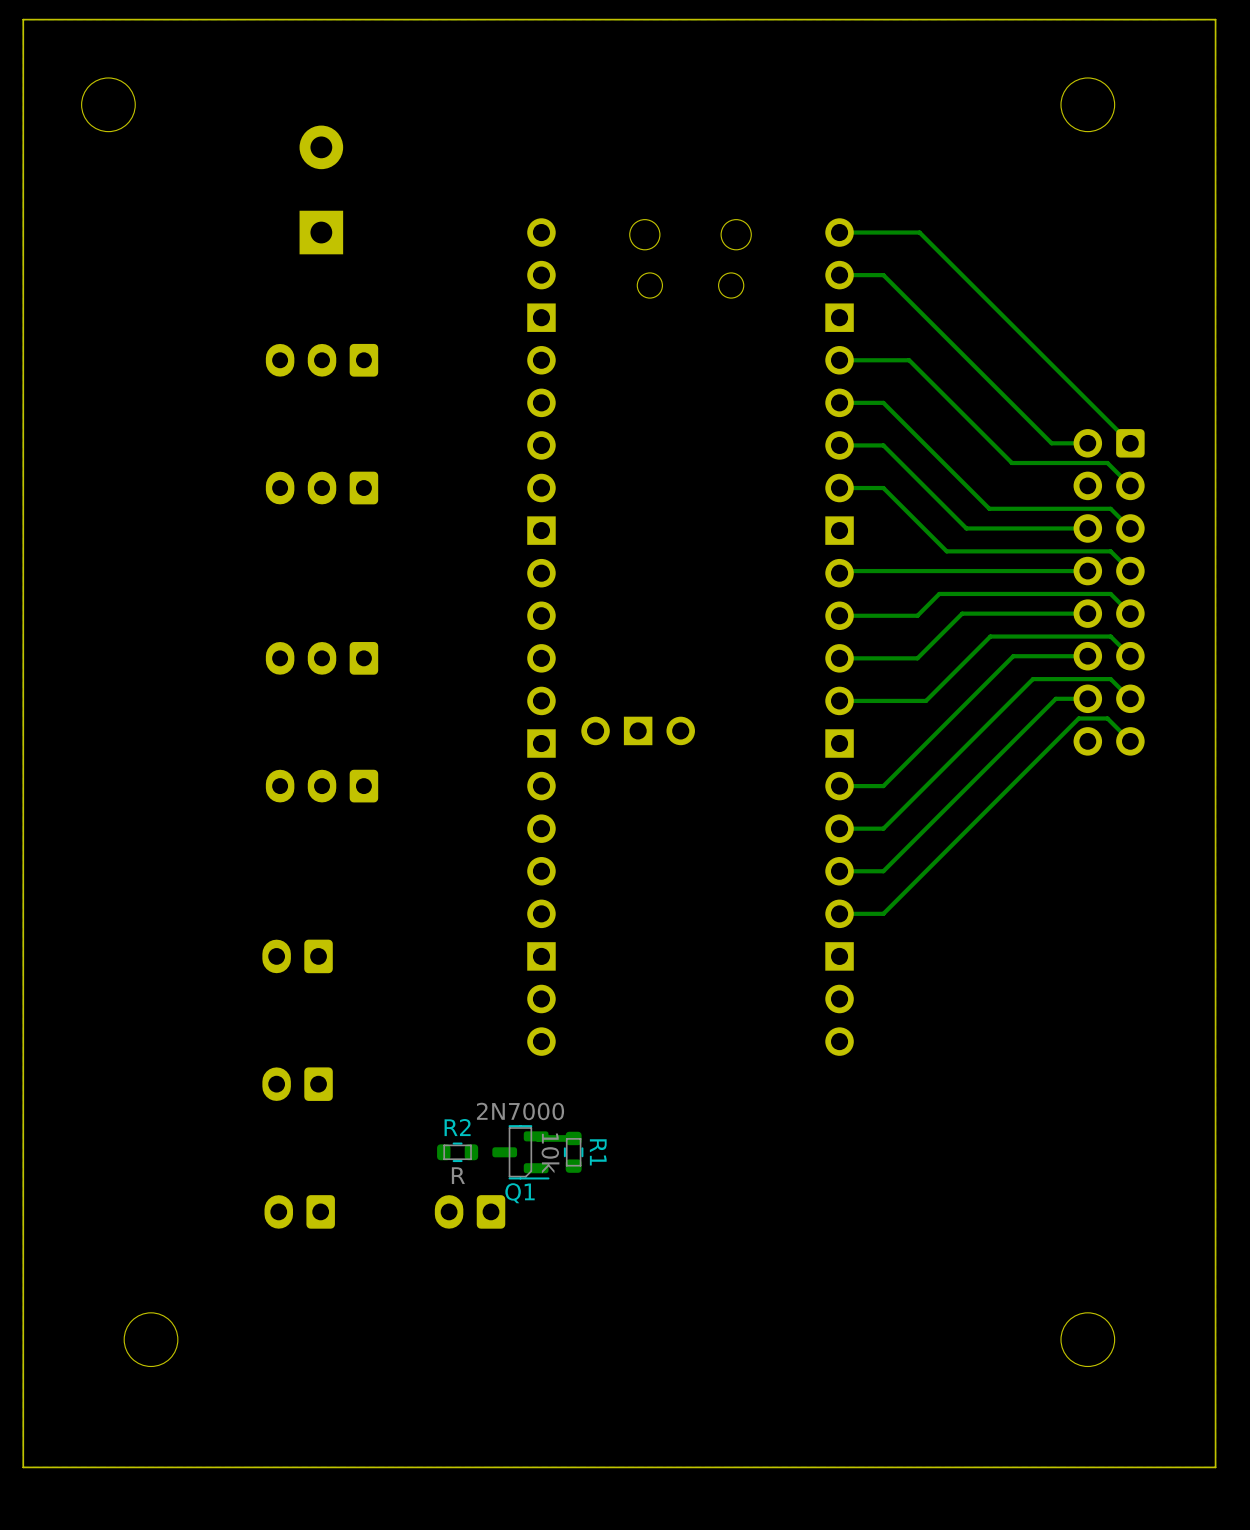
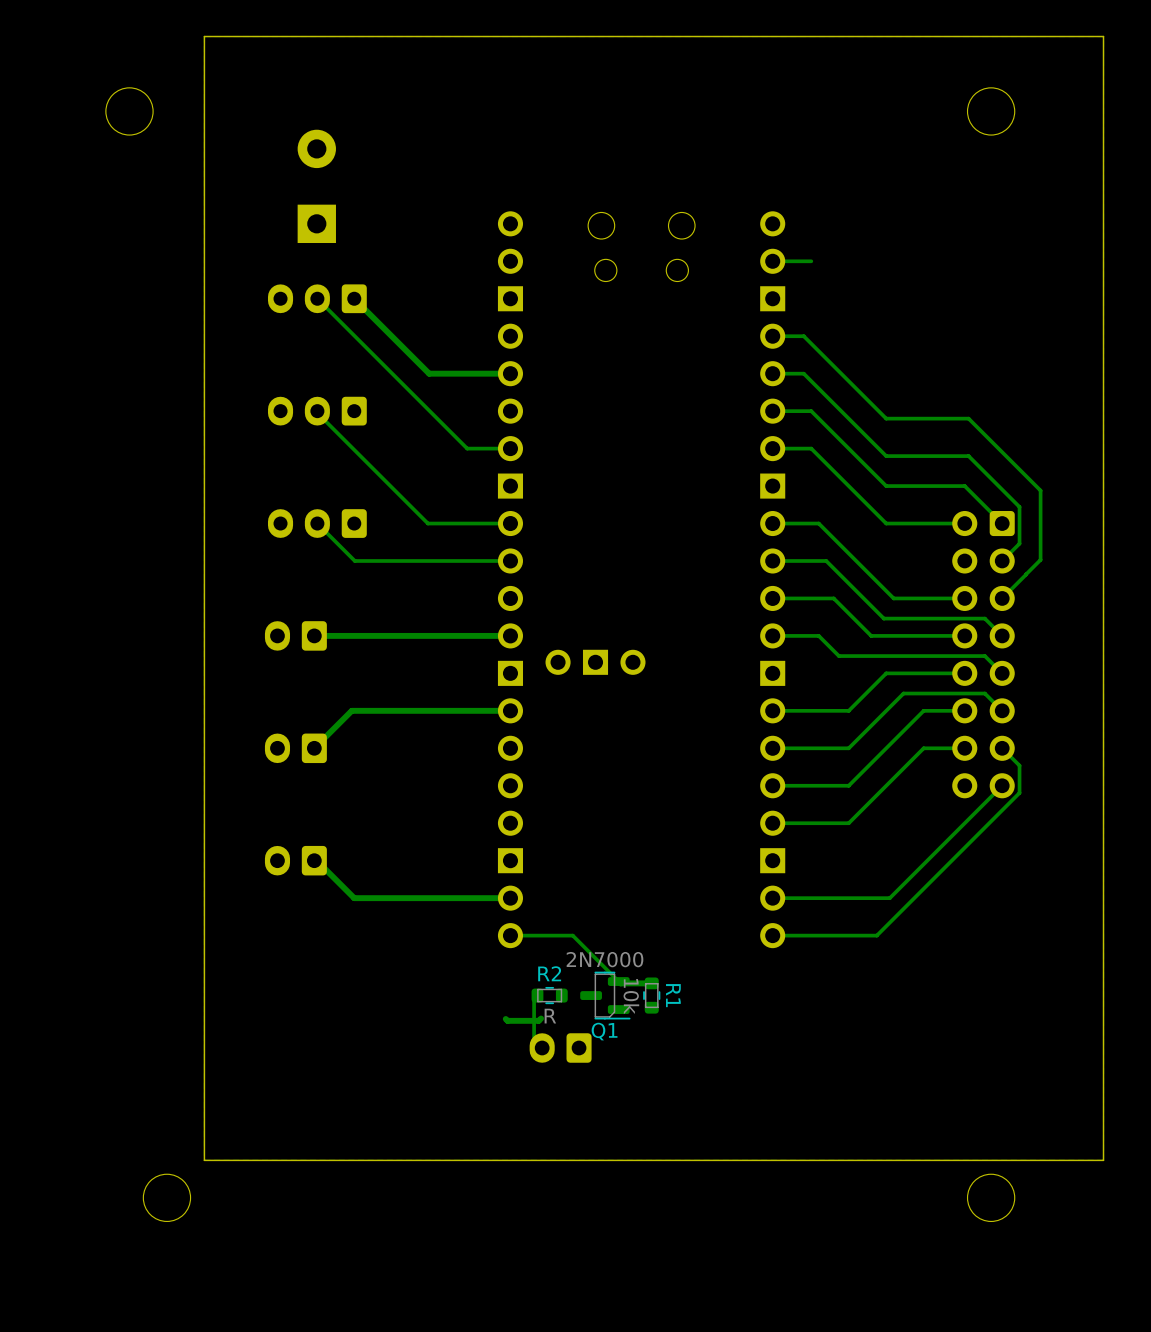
board edge: (193, 19) (23, 19) (23, 1467) (1215, 1467) (1215, 1297) -> (204, 36) (204, 1160) (1103, 1160)
track: (839, 232) (919, 232) (1130, 443) -> none
track: (883, 275) (1051, 443) (1087, 443) -> none
track: none -> (317, 298) (467, 448) (510, 448)
part: none -> (317, 298)
track: none -> (354, 298) (429, 373) (510, 373)
part: (322, 360) -> none
track: (908, 360) (874, 360) -> (1026, 574) (1040, 559) (1040, 490) (968, 418) (886, 418) (803, 336)
track: (908, 360) (1011, 462) -> none
track: (874, 402) (883, 402) (989, 508) (1110, 508) (1130, 528) -> (803, 373) (886, 456) (968, 456) (1019, 506) (1019, 543) (1002, 560)
track: none -> (317, 411) (427, 523) (510, 523)
part: none -> (317, 411)
track: (1011, 463) (1107, 463) (1130, 485) -> none
part: (322, 488) -> none
track: (1087, 528) (966, 528) -> (1002, 523) (964, 486) (886, 486) (884, 484)
track: (946, 551) (1110, 551) (1130, 571) -> (867, 504) (886, 523) (964, 523)
track: (1087, 571) (841, 571) -> none
track: none -> (317, 523) (354, 560) (510, 560)
part: none -> (317, 523)
track: none -> (772, 523) (818, 523) (893, 598) (964, 598)
part position: (1109, 592) -> (983, 654)
track: (1087, 613) (962, 613) (917, 658) (908, 658) -> (964, 635) (871, 635) (833, 598)
track: (1130, 613) (1110, 593) (939, 593) (917, 615) (900, 615) -> (1002, 635) (984, 618) (883, 618) (826, 560)
track: none -> (1026, 574) (1002, 598)
track: (1087, 656) (1013, 656) (883, 786) -> none
track: (1130, 656) (1110, 636) (990, 636) (926, 700) (891, 700) -> (1002, 673) (984, 656) (838, 656) (818, 635)
part: (322, 658) -> none
track: (1087, 698) (1055, 698) (988, 766) -> (1002, 710) (984, 693) (903, 693)
track: (1130, 698) (1110, 679) (1032, 679) (968, 743) -> (964, 673) (886, 673)
part: none -> (295, 635)
track: none -> (510, 635) (314, 635)
track: (1130, 741) (1107, 718) (1078, 718) (1011, 786) -> (964, 710) (923, 710)
part: (322, 786) -> none
track: none -> (510, 710) (351, 710) (314, 748)
track: (926, 786) (883, 828) -> (848, 710) (811, 710)
part: none -> (295, 748)
track: (926, 828) (883, 871) -> (848, 748) (811, 748)
track: none -> (964, 748) (923, 748) (848, 823) (811, 823)
track: none -> (1002, 748) (1019, 765) (1019, 792) (876, 935) (772, 935)
track: (926, 871) (883, 913) -> (848, 785) (811, 785)
track: none -> (1002, 785) (889, 898) (772, 898)
track: none -> (316, 860) (354, 898) (510, 898)
track: none -> (510, 935) (572, 935) (620, 983) (651, 983) (654, 981)
part: (297, 1084) -> none
track: none -> (537, 995) (534, 998) (534, 1039) (542, 1048)
R2 position: (457, 1152) -> (549, 995)
Q1 position: (520, 1152) -> (605, 995)
R1 position: (573, 1152) -> (651, 995)
part: (299, 1211) -> none
part position: (470, 1211) -> (560, 1048)

